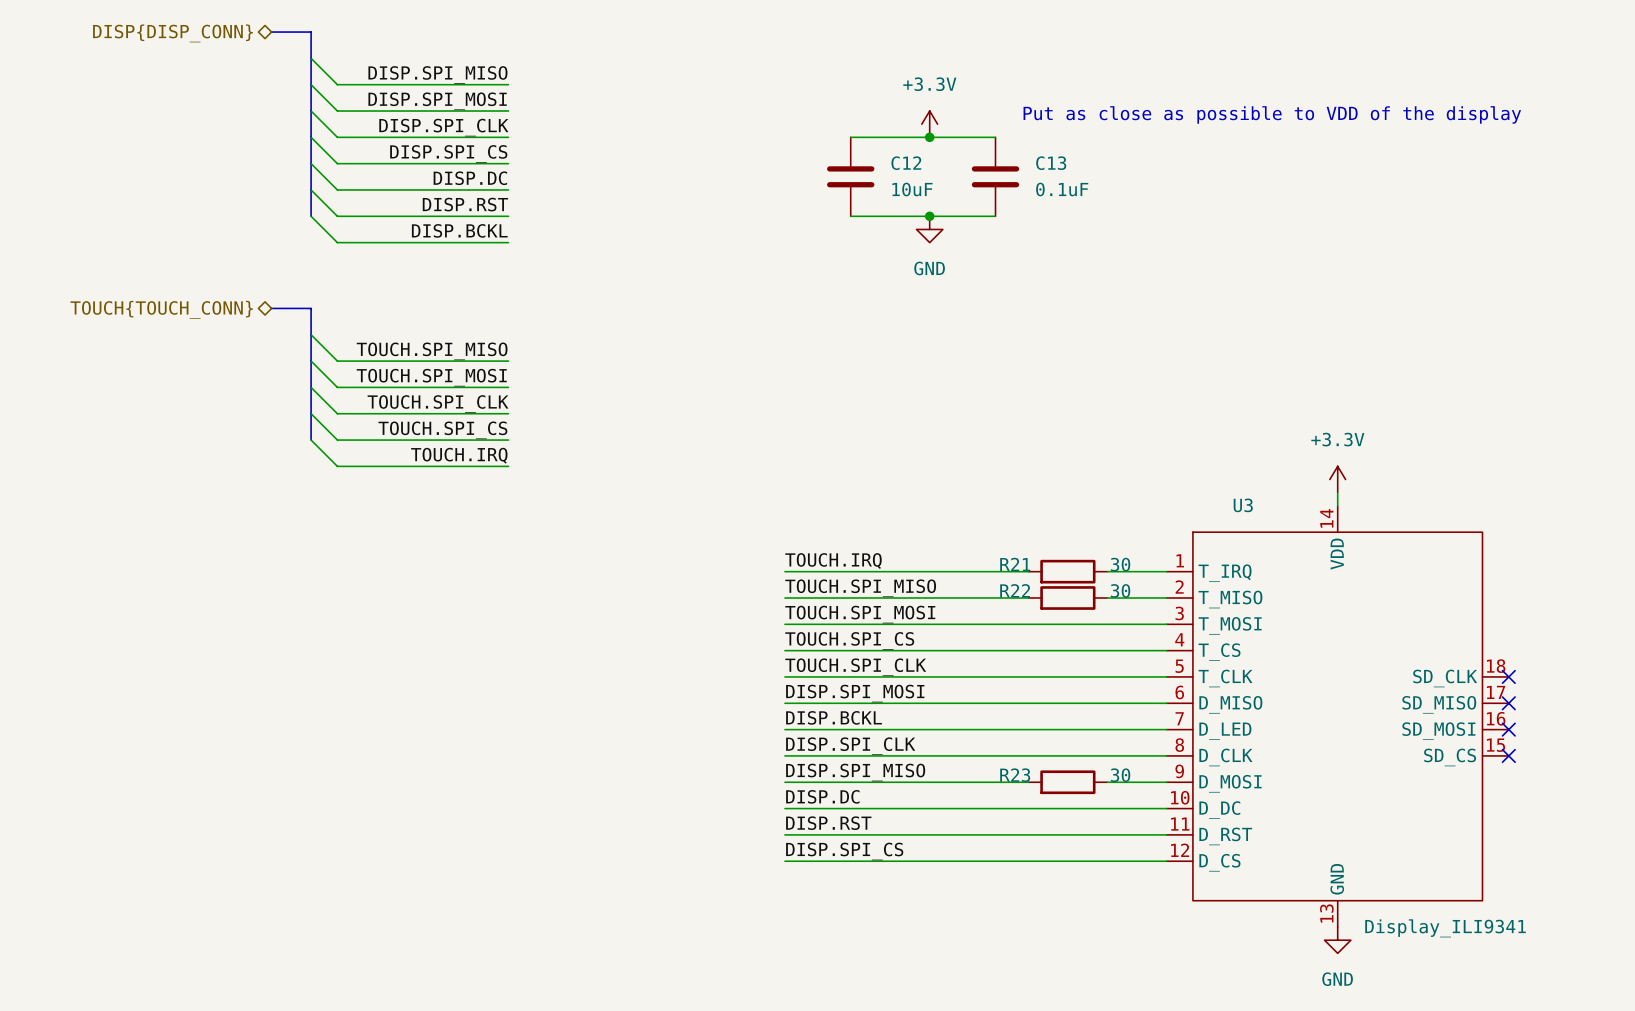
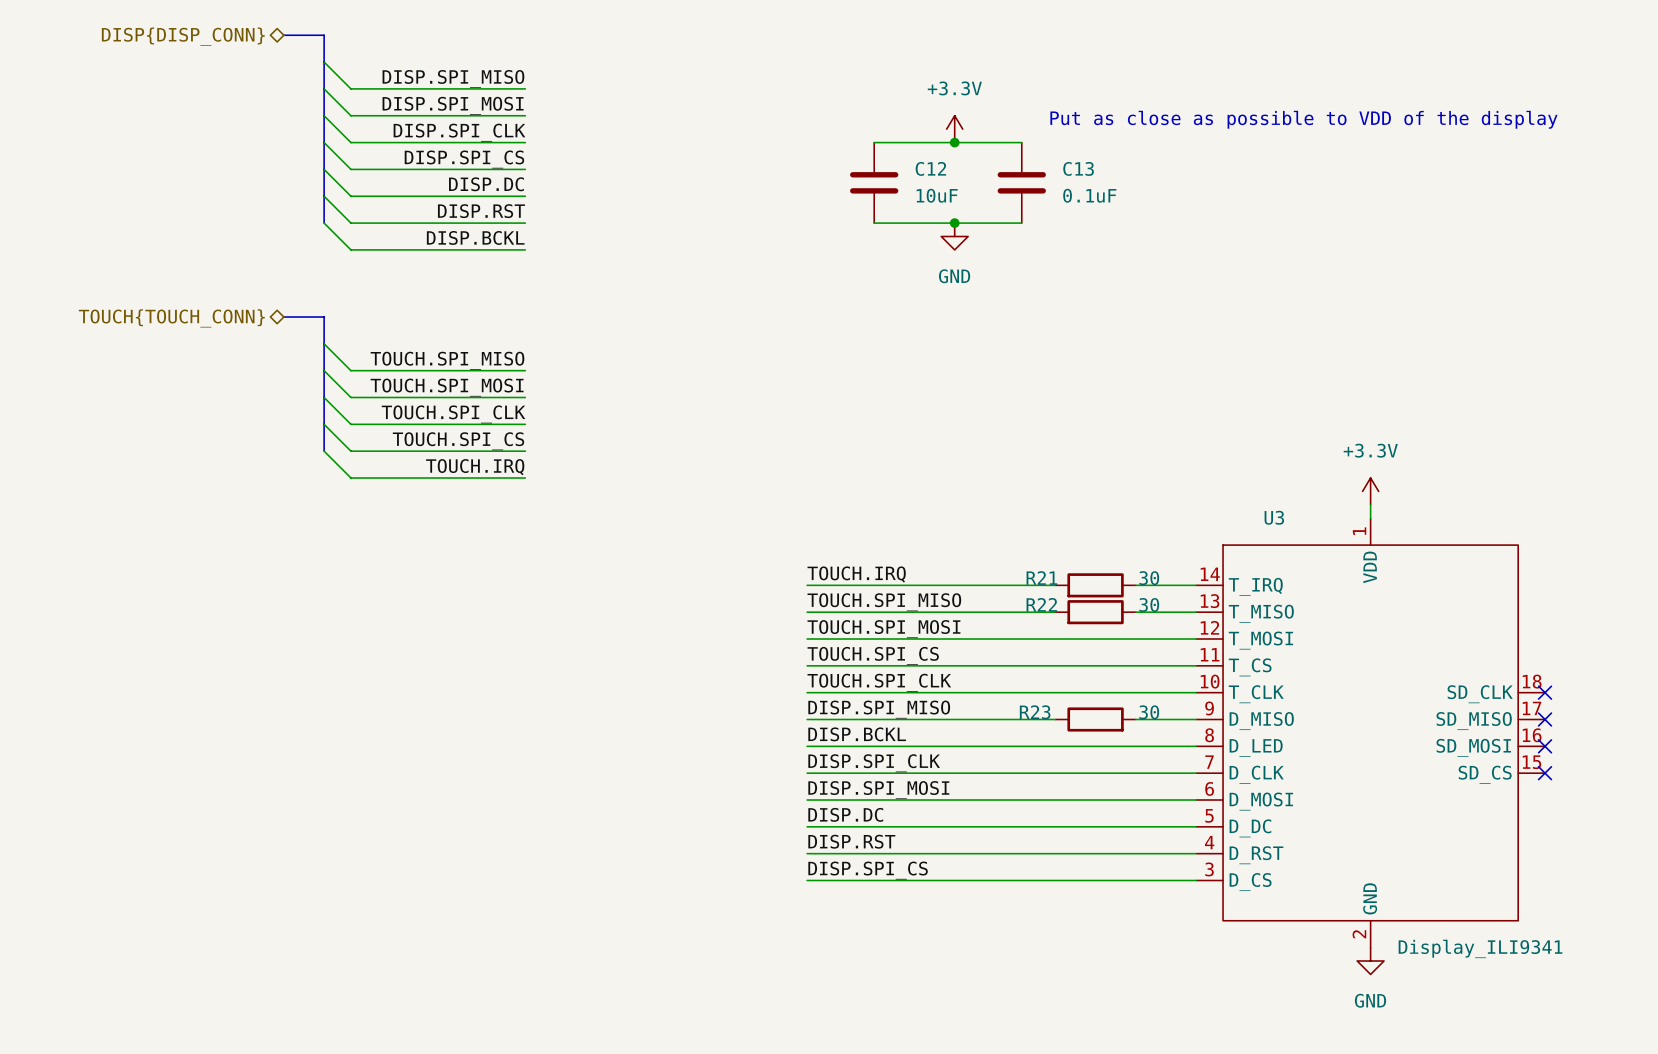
U3 symbol: [1166, 505, 1509, 928] -> [1196, 518, 1546, 948]
label: DISP.SPI_MOSI (855, 693) -> DISP.SPI_MISO (879, 709)
wire: (1028, 703) (1107, 703) -> (1055, 800) (1135, 800)
label: DISP.SPI_MISO (855, 772) -> DISP.SPI_MOSI (878, 790)
R23 name position: R23 (1015, 775) -> R23 (1035, 712)
R23 position: (1067, 782) -> (1095, 719)

